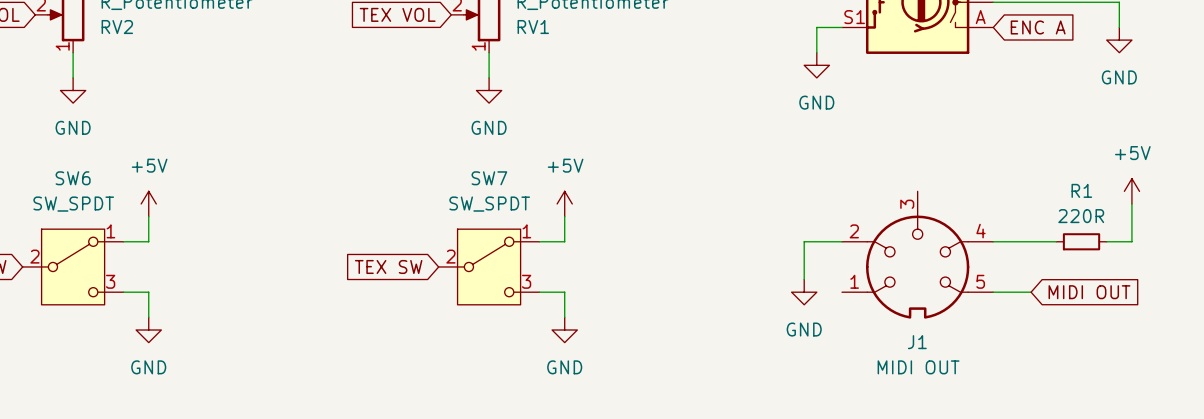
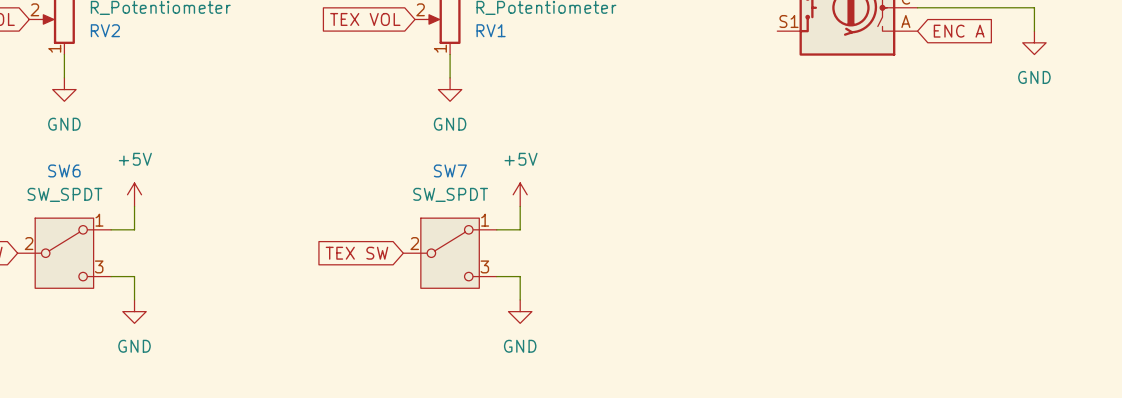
wire: (842, 27) (816, 27) (816, 52) -> none
power symbol: GND (816, 65) -> none
power symbol: +5V (1131, 191) -> none
wire: (1131, 203) (1131, 241) (1106, 241) -> none
wire: (842, 241) (804, 241) (804, 279) -> none
wire: (993, 241) (1056, 241) -> none
R1: 220R (1081, 241) -> none
J1: MIDI OUT (917, 255) -> none
power symbol: GND (804, 292) -> none
wire: (993, 292) (1031, 292) -> none
global label: MIDI OUT (1089, 292) -> none

